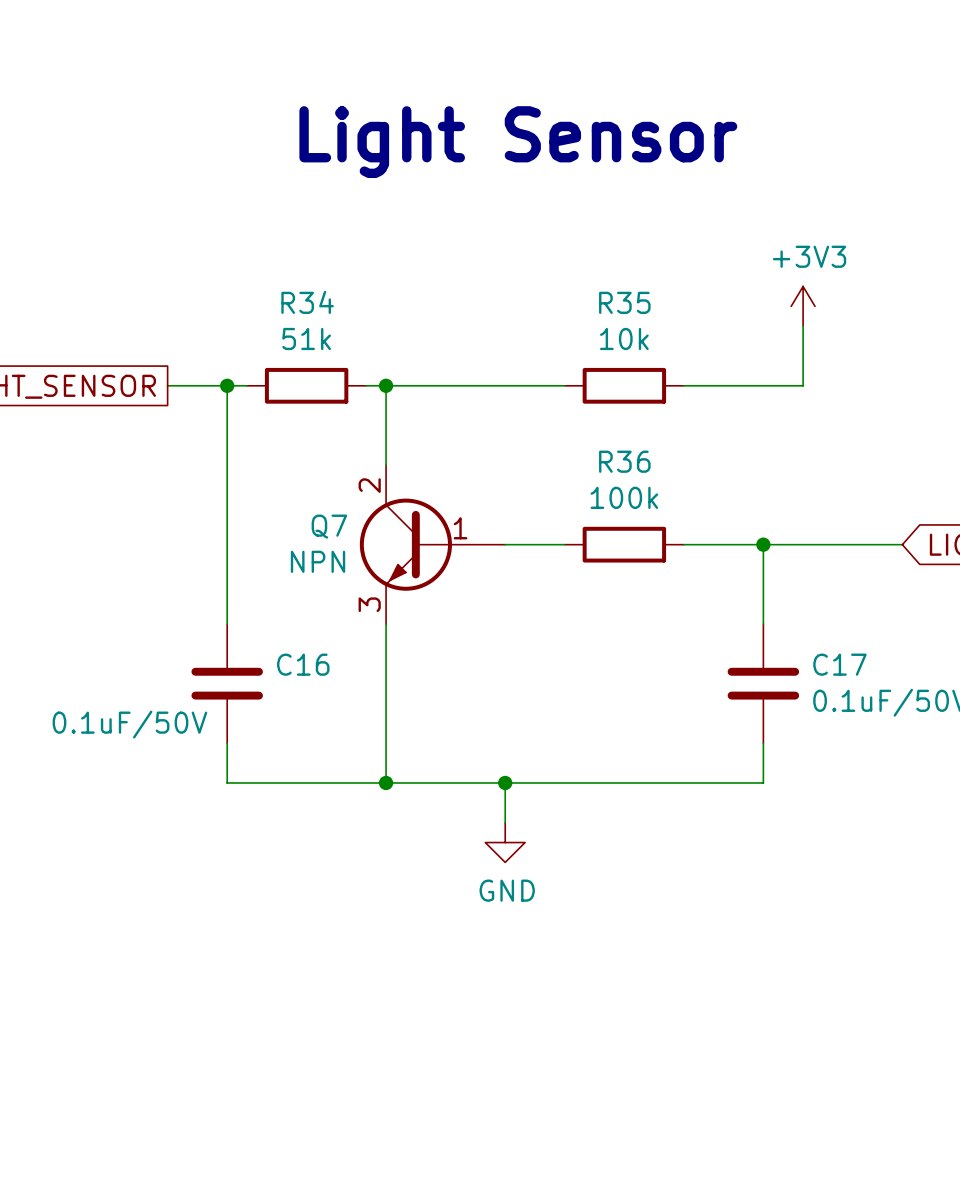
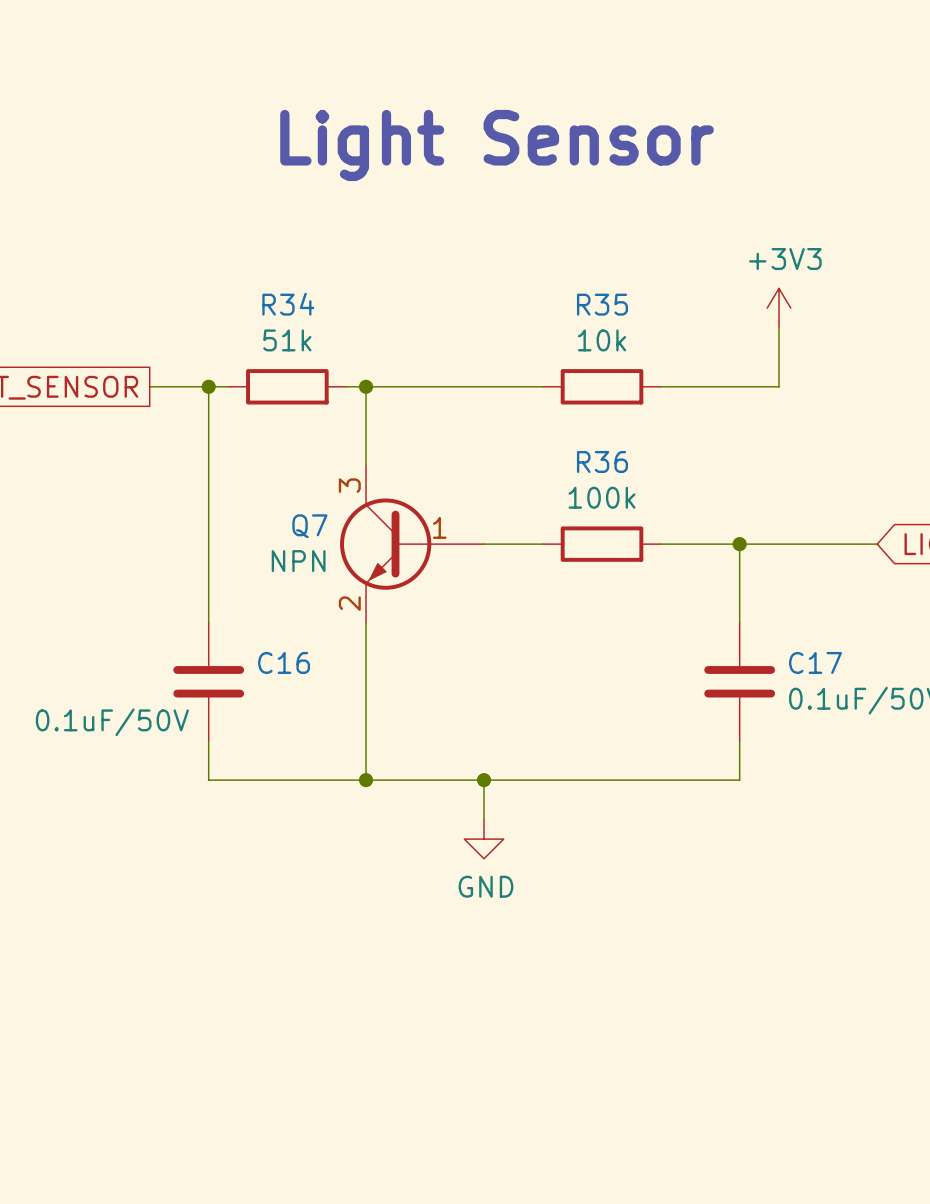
Q7 pin number: 2 (369, 485) -> 3 (349, 485)
Q7 pin number: 3 (369, 604) -> 2 (349, 603)

